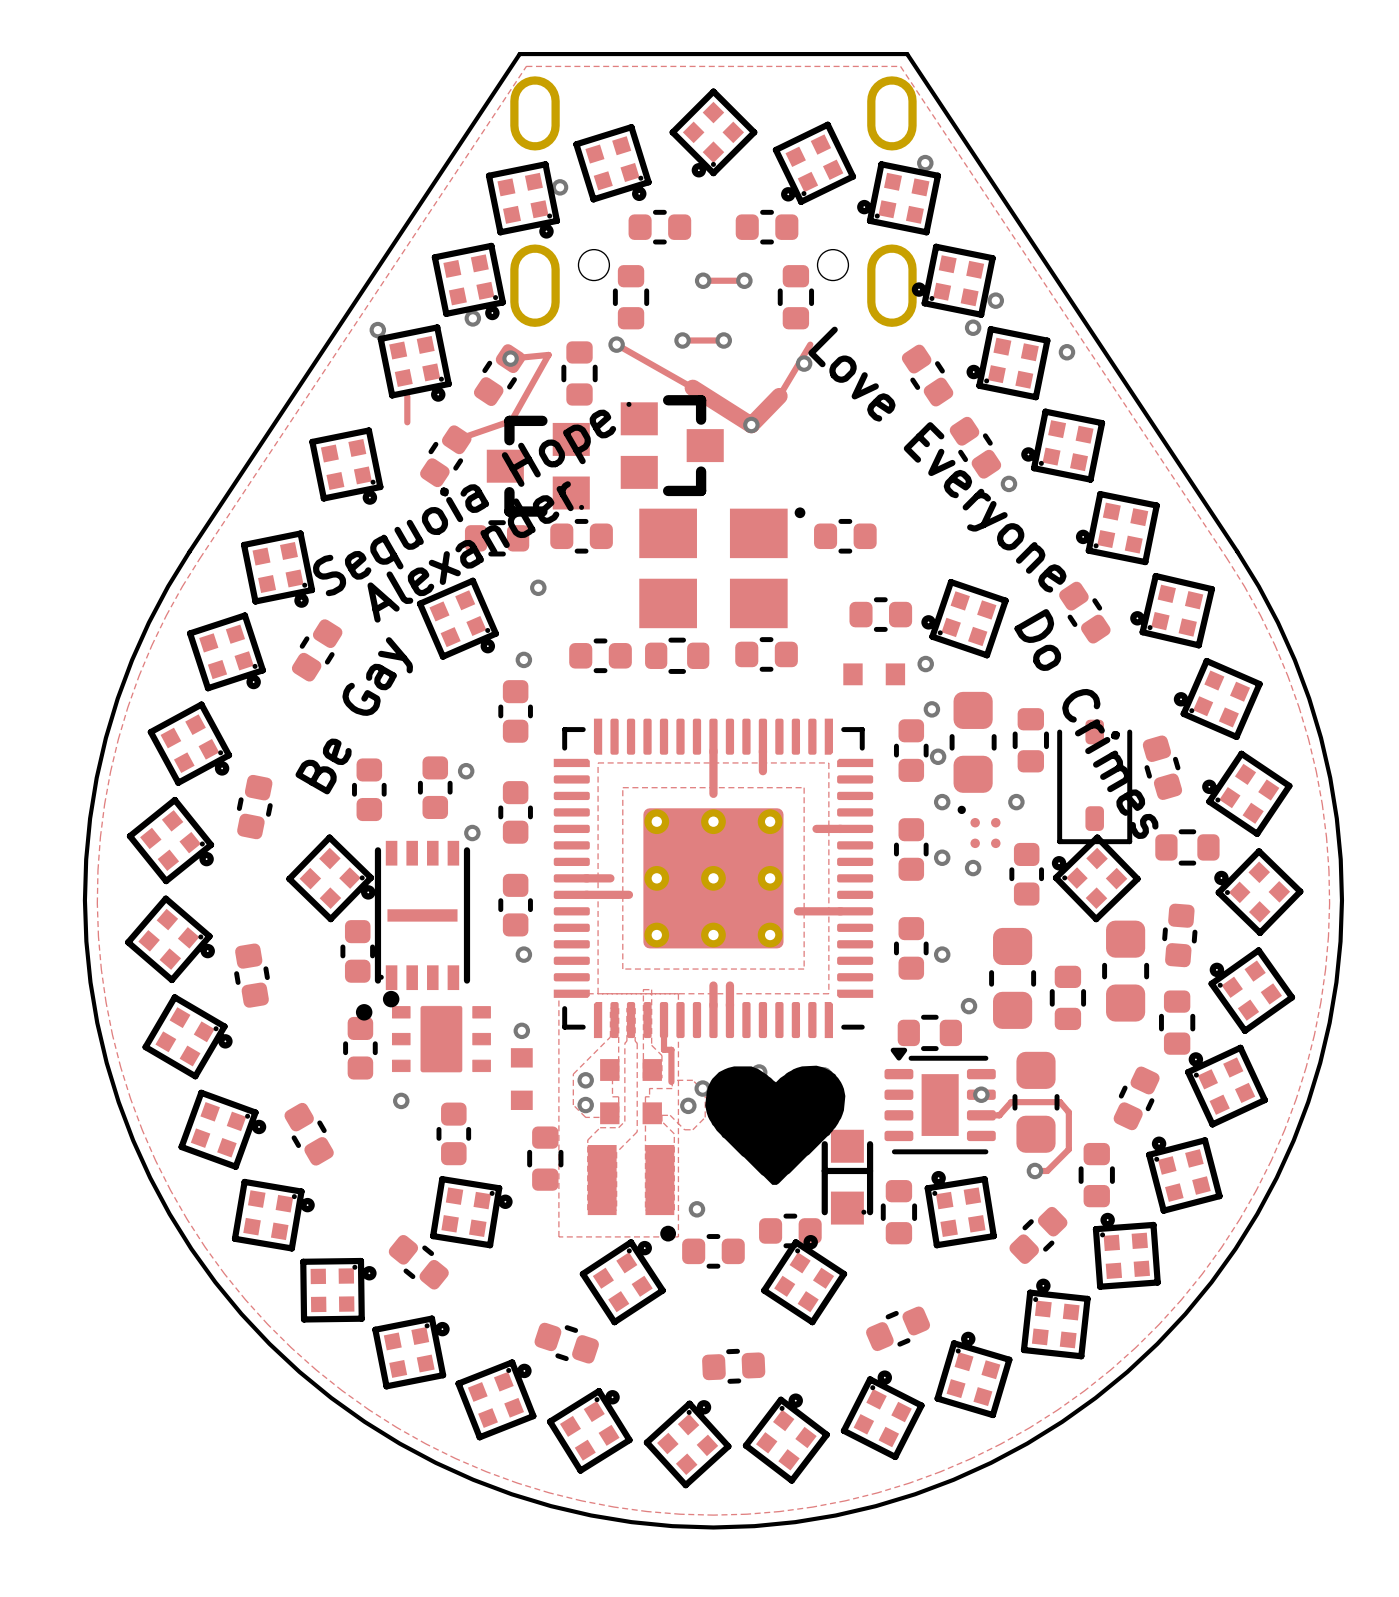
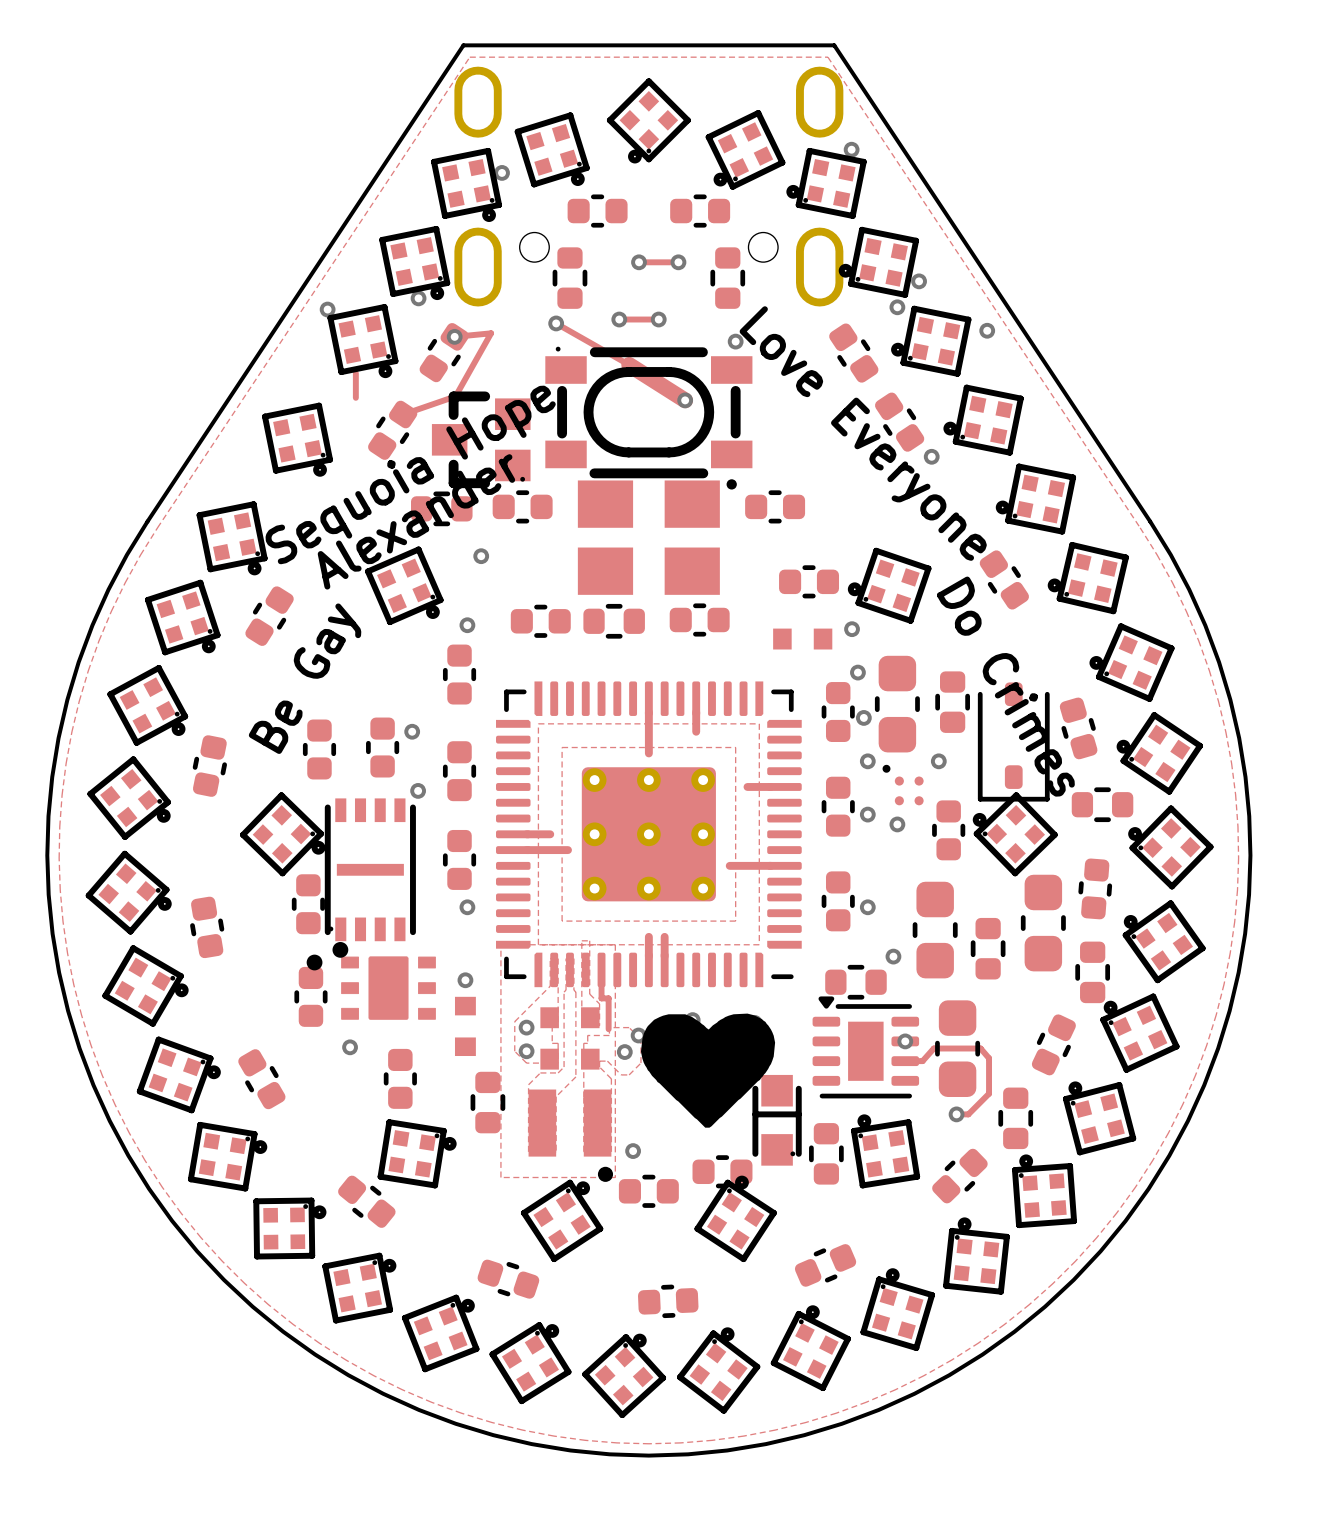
track: (810, 344) (779, 396) (751, 424) -> none
part: (579, 373) -> none
part: none -> (648, 412)
part: (672, 445) -> none

